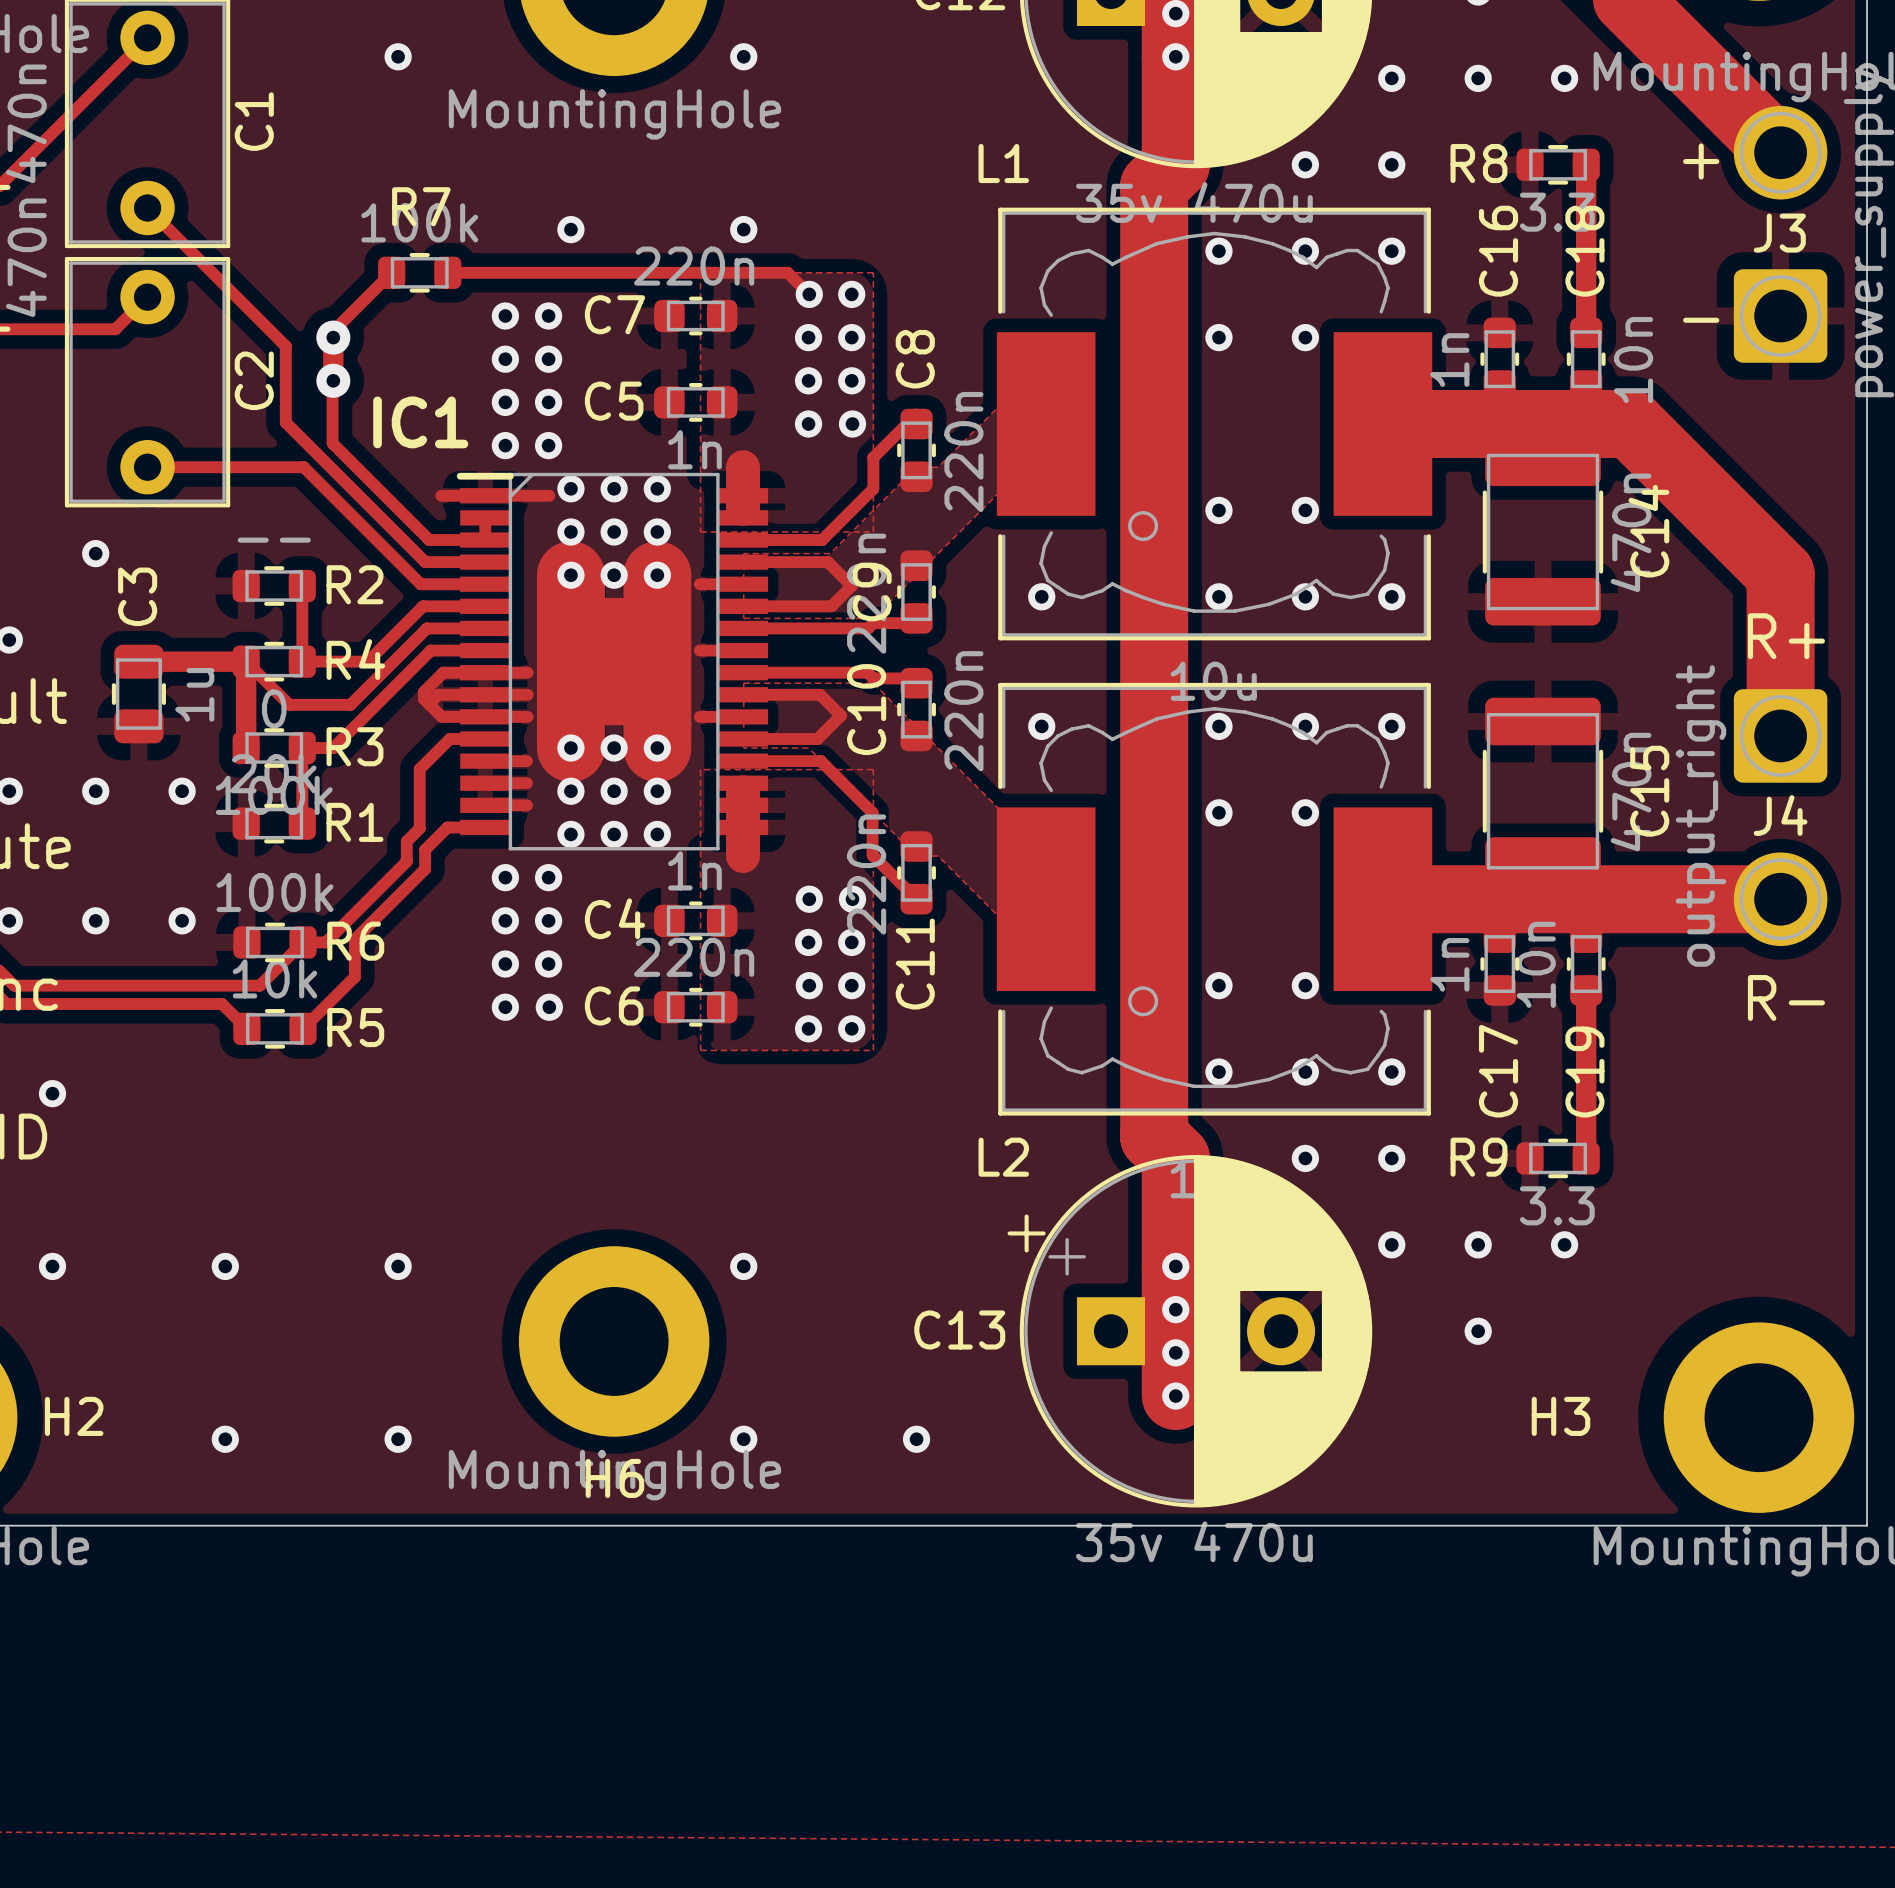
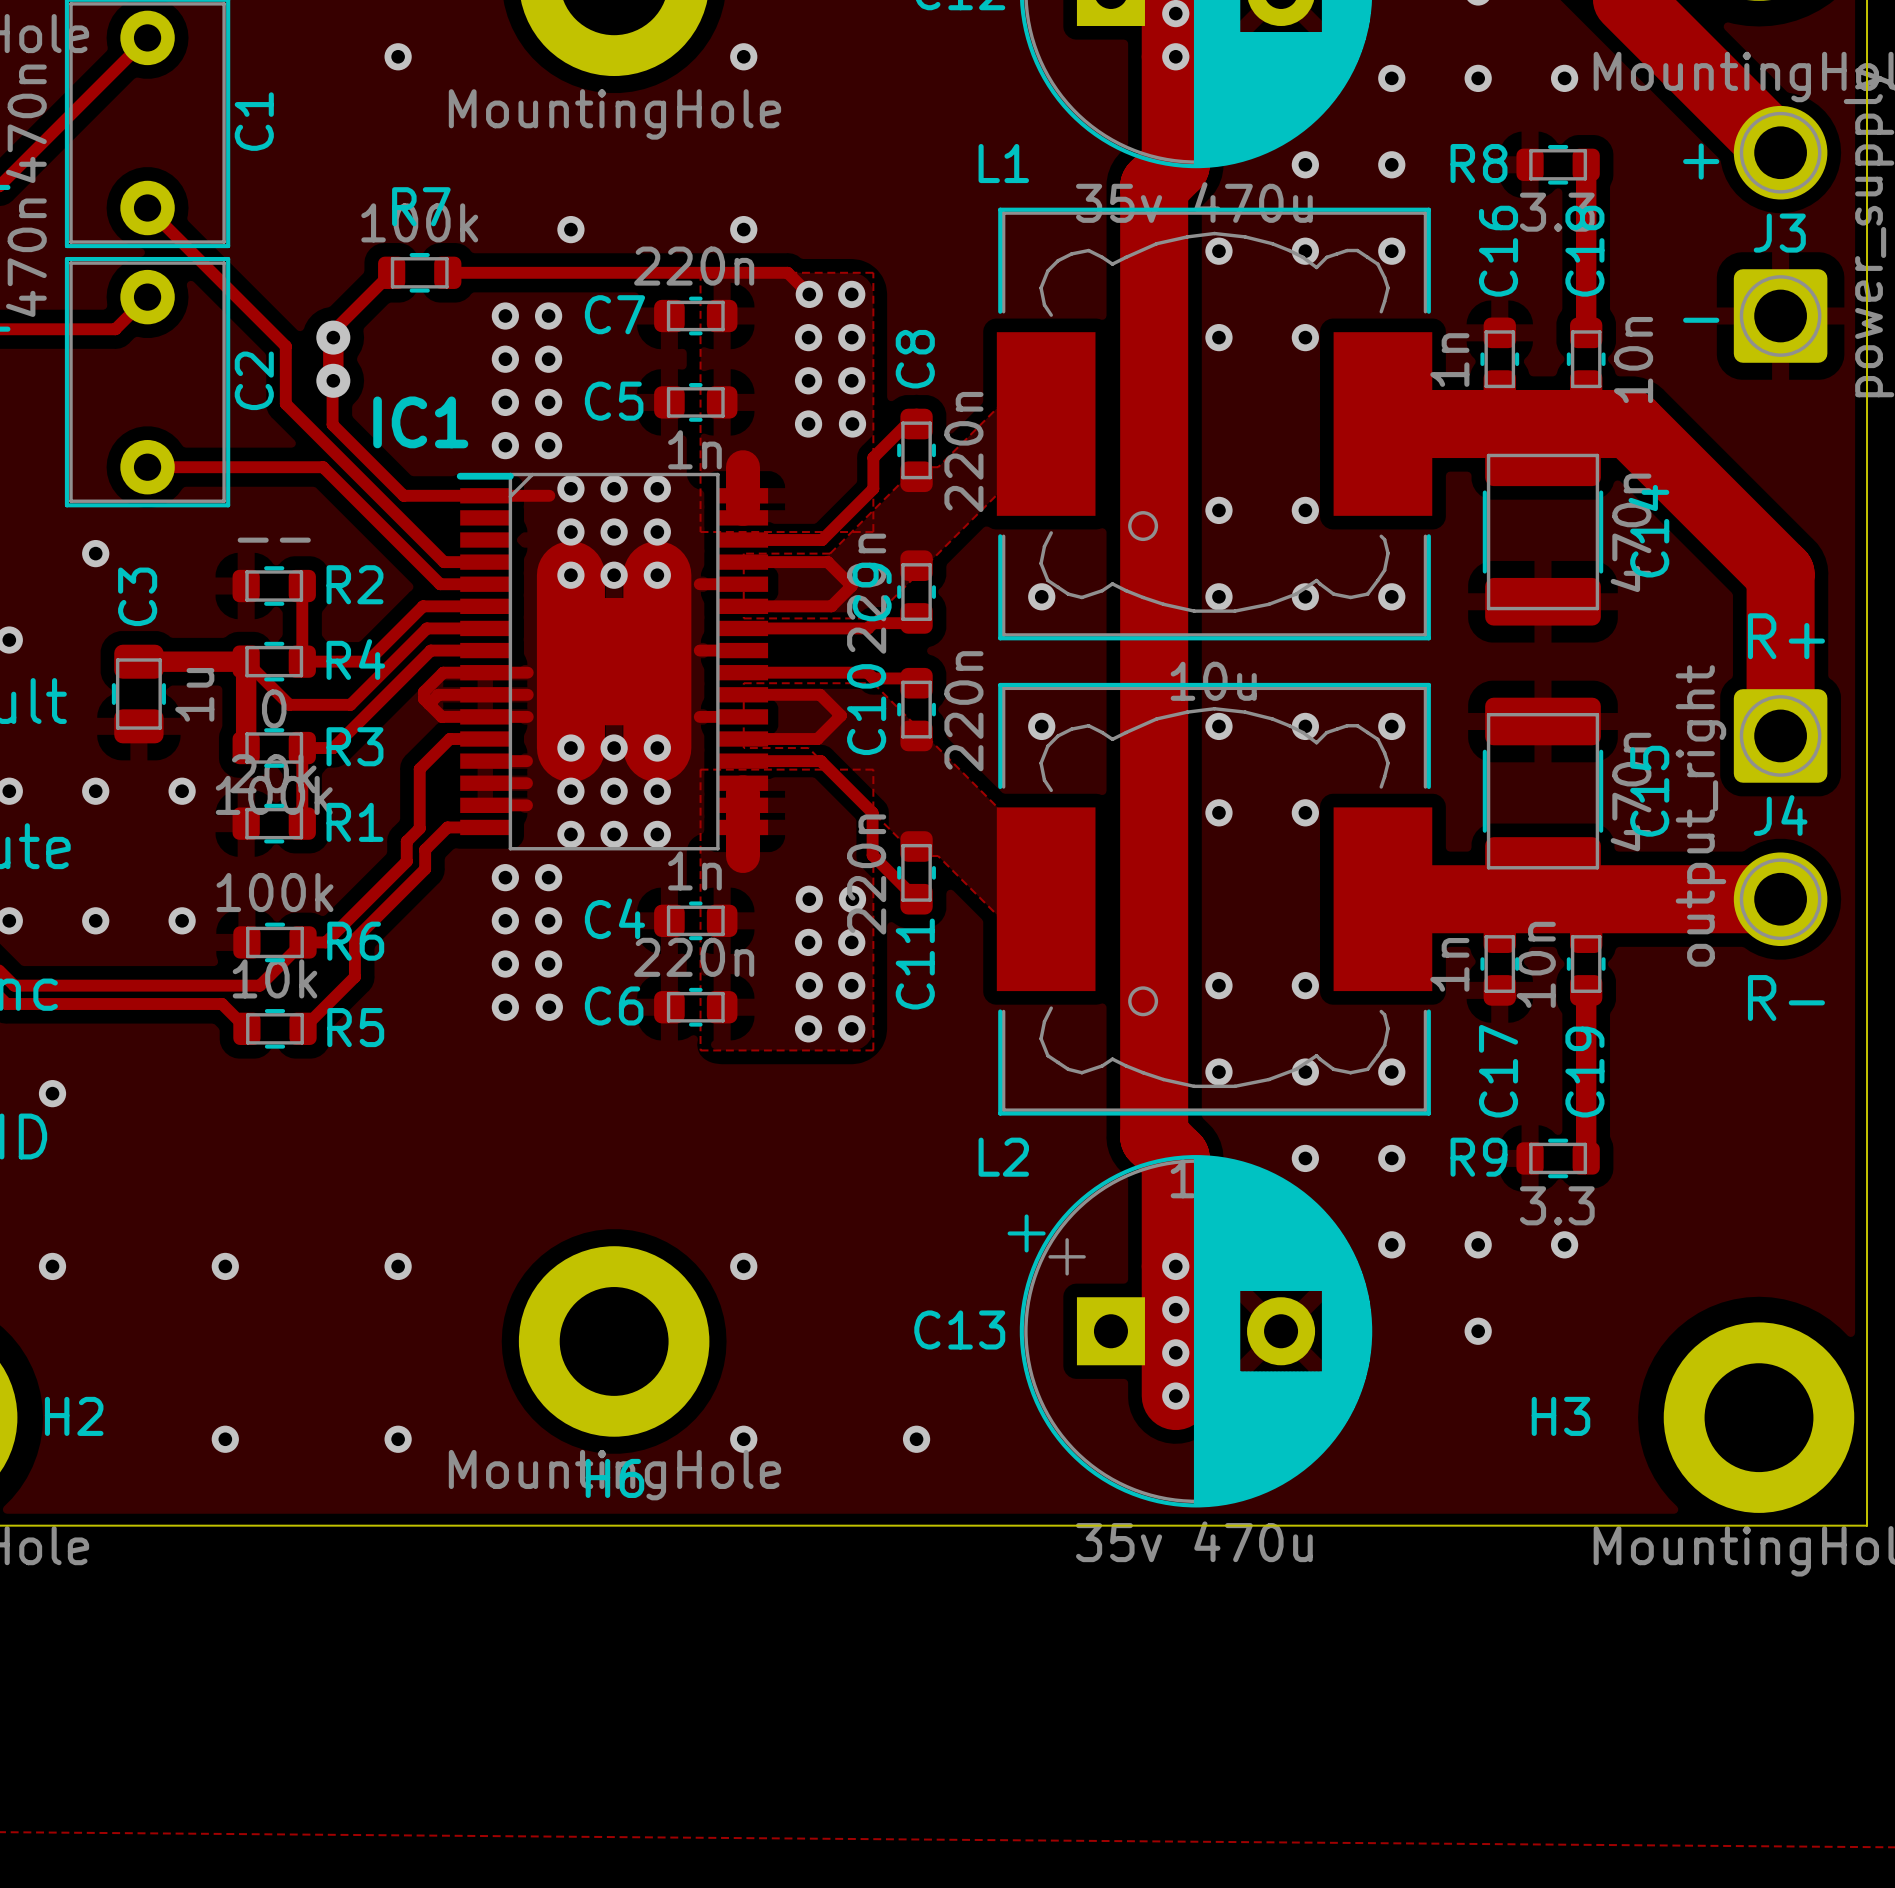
track: (285, 403) (285, 422) (425, 562) (444, 562) -> (285, 403) (444, 562)
track: (332, 424) (332, 443) (429, 540) (485, 540) (485, 517) -> (332, 424) (403, 495) (441, 495)
track: (303, 467) (420, 584) (440, 584) -> (303, 467) (323, 467) (440, 584)

